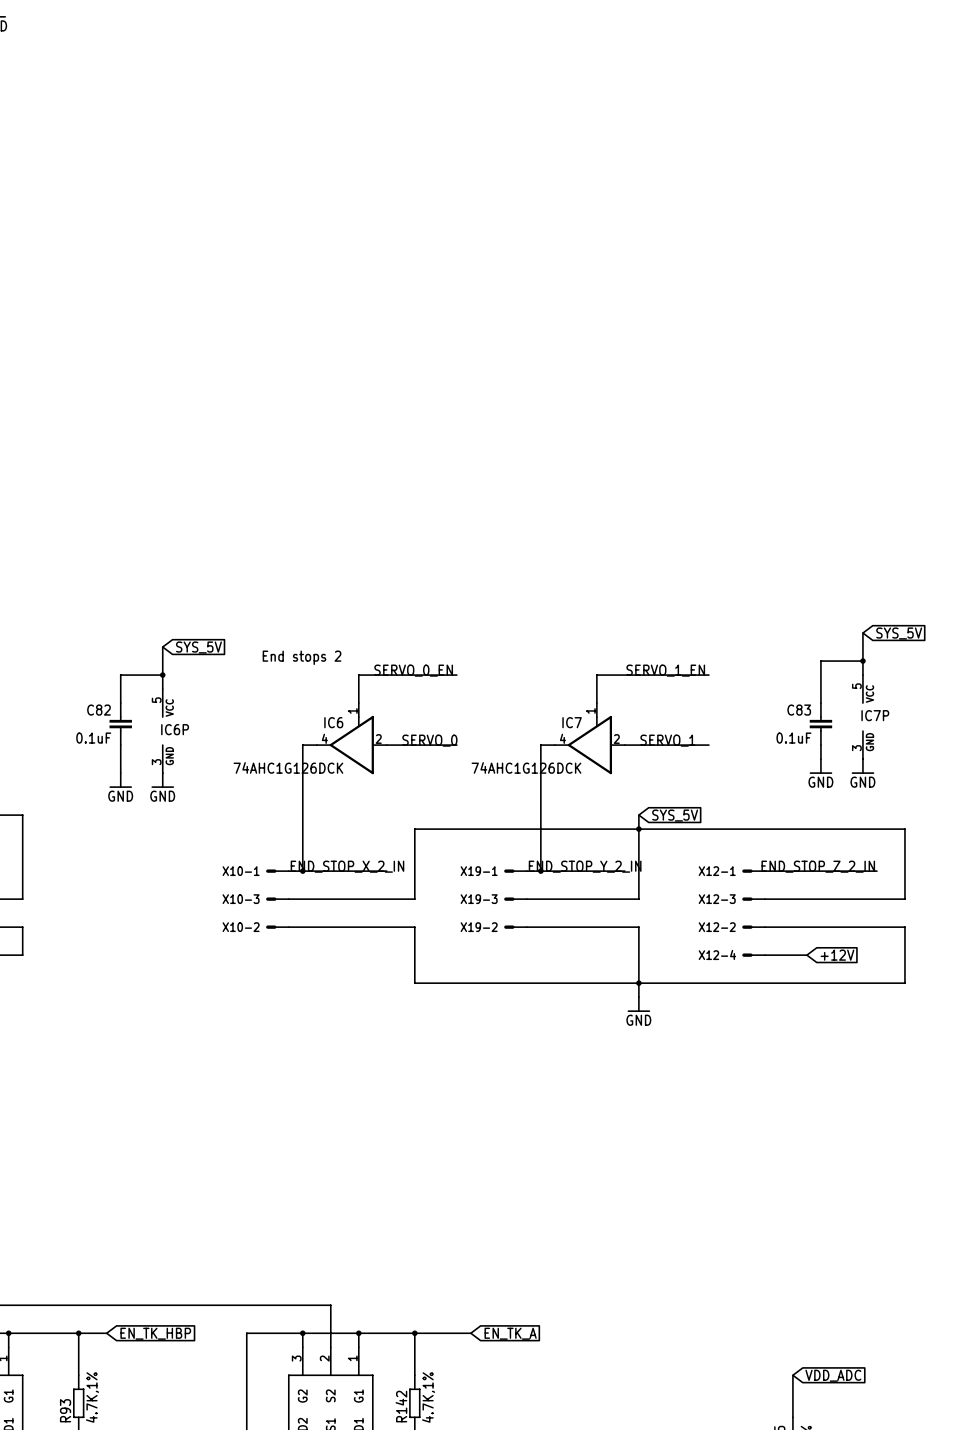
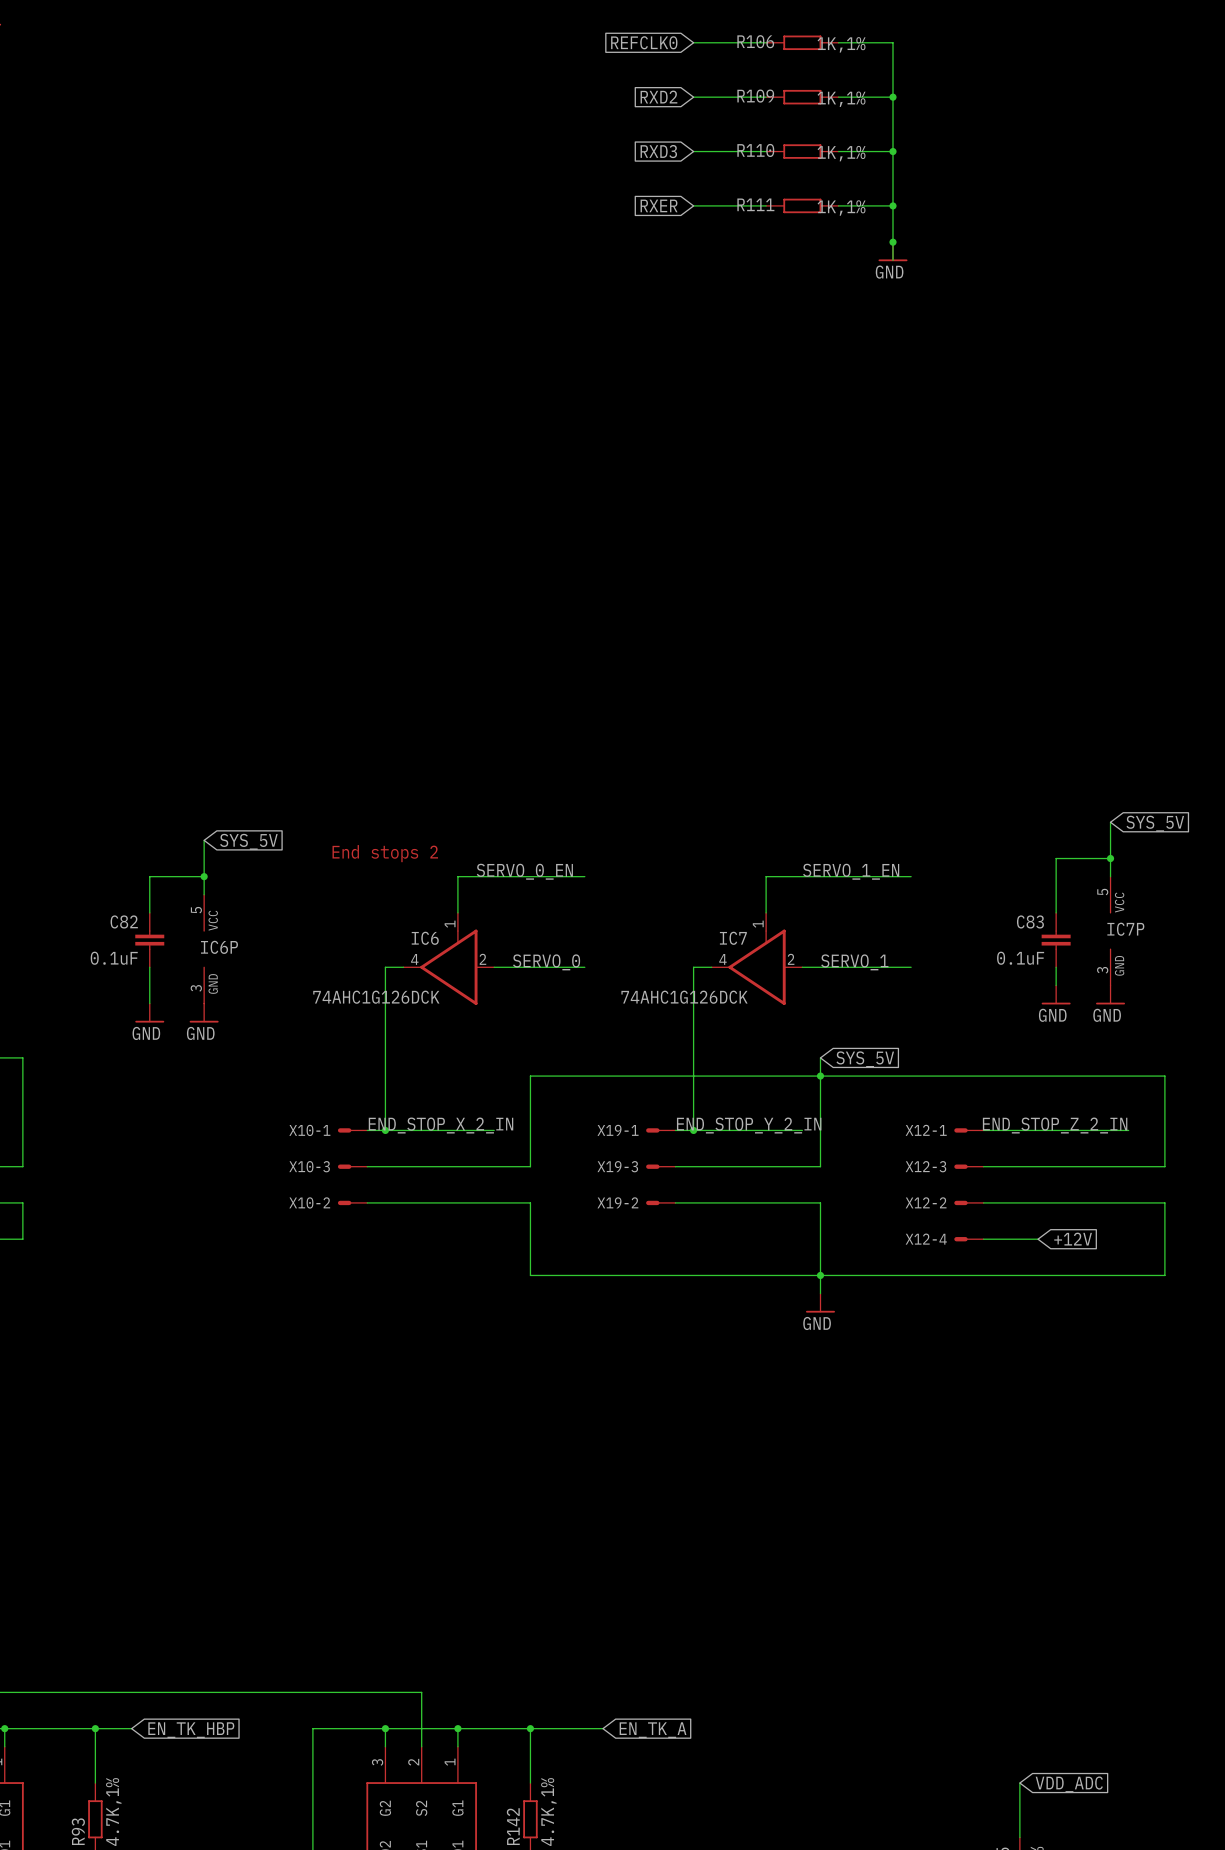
global label: none -> REFCLK0 (644, 42)
wire: none -> (693, 42) (766, 42)
R106: none -> 1K,1% (802, 42)
wire: none -> (838, 42) (892, 42) (892, 260)
global label: none -> RXD2 (658, 97)
wire: none -> (693, 97) (766, 97)
R109: none -> 1K,1% (802, 97)
wire: none -> (838, 97) (892, 97)
junction: none -> (892, 97)
global label: none -> RXD3 (658, 151)
wire: none -> (693, 151) (766, 151)
R110: none -> 1K,1% (802, 151)
wire: none -> (838, 151) (892, 151)
junction: none -> (892, 151)
global label: none -> RXER (659, 205)
wire: none -> (693, 205) (766, 205)
R111: none -> 1K,1% (802, 205)
wire: none -> (838, 205) (892, 205)
junction: none -> (892, 205)
junction: none -> (892, 242)
power symbol: none -> GND (892, 251)

